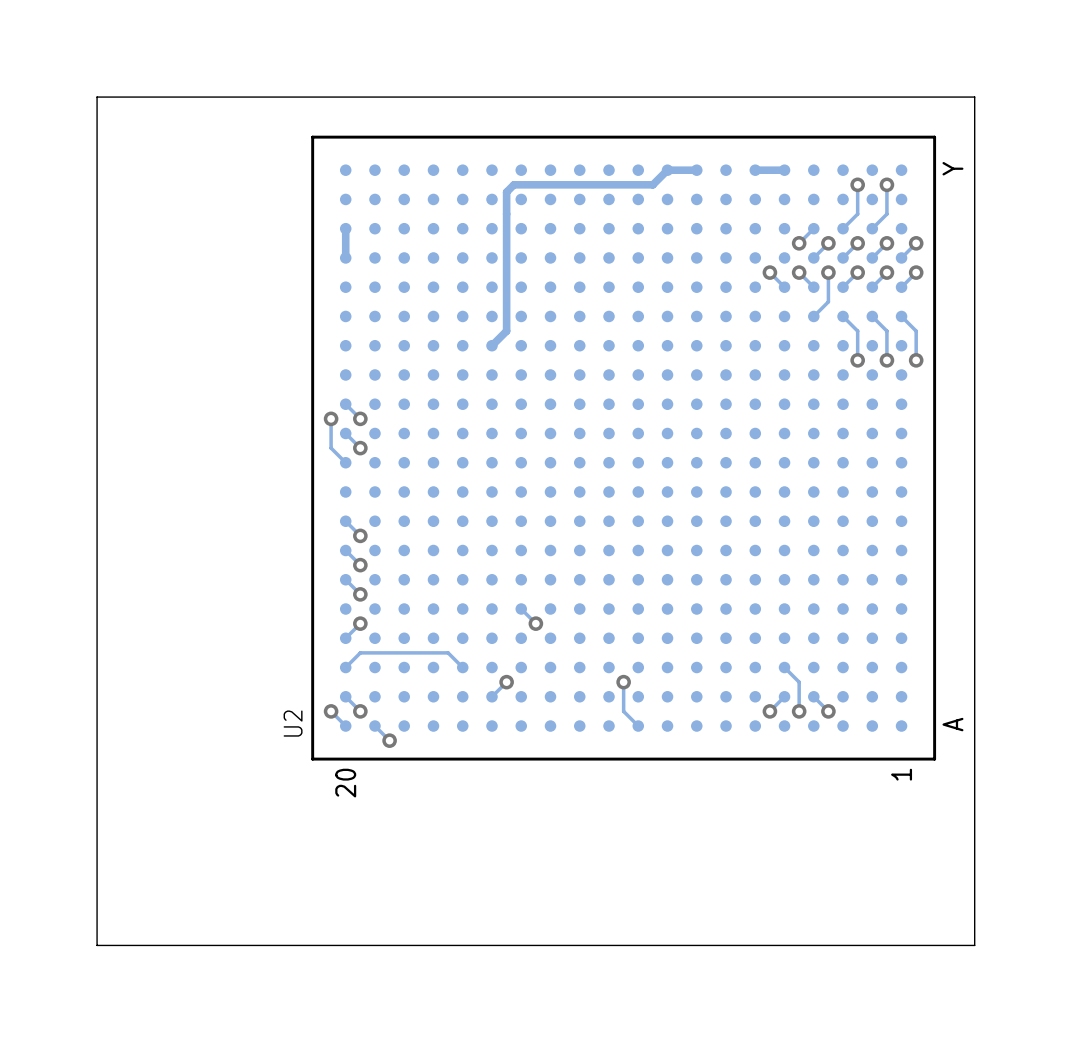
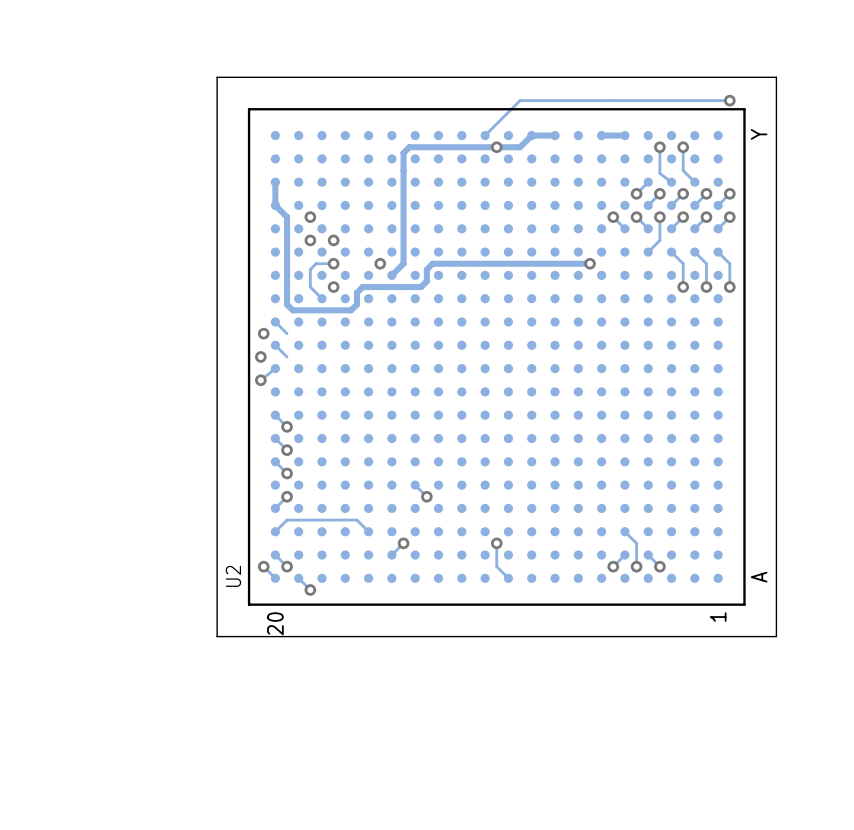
board edge: (272, 97) (97, 97) (97, 945) (974, 945) (974, 799) -> (217, 77) (217, 636) (776, 636)
track: none -> (729, 100) (520, 100) (485, 135)
via: none -> (729, 100)
via: none -> (496, 147)
track: none -> (659, 147) (659, 173) (671, 182)
via: none -> (659, 147)
track: (886, 184) (886, 214) (872, 228) -> none
via: (886, 184) -> none
track: (857, 214) (843, 228) -> (683, 170) (694, 182)
track: none -> (275, 205) (287, 217) (287, 304) (292, 310) (351, 310) (356, 304) (356, 292) (362, 287) (421, 287) (426, 281) (426, 269) (432, 263) (589, 263)
via: none -> (310, 217)
via: none -> (310, 240)
via: none -> (333, 240)
track: none -> (333, 263) (316, 263) (310, 269) (310, 287) (321, 298)
via: none -> (333, 263)
via: none -> (380, 263)
via: none -> (589, 263)
via: none -> (333, 287)
track: (331, 418) (331, 448) (345, 462) -> (260, 380) (275, 368)
via: (360, 418) -> none
via: none -> (260, 356)
via: (360, 448) -> none
via: none -> (260, 380)

